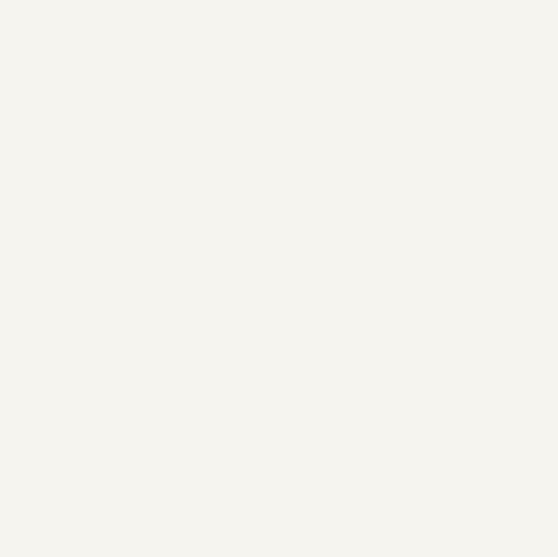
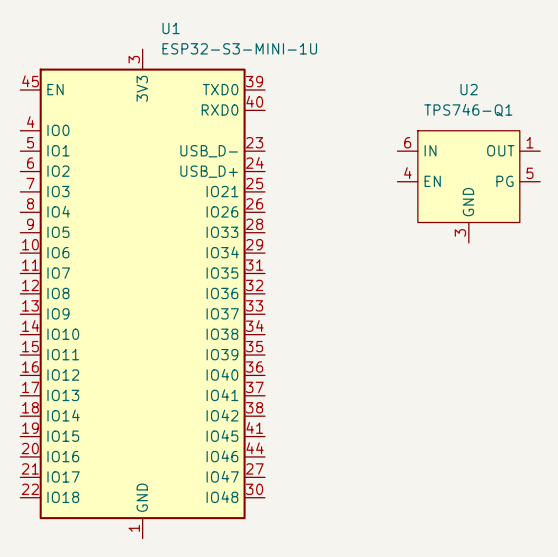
U2: none -> TPS746-Q1 (468, 186)
U1: none -> ESP32-S3-MINI-1U (142, 293)

